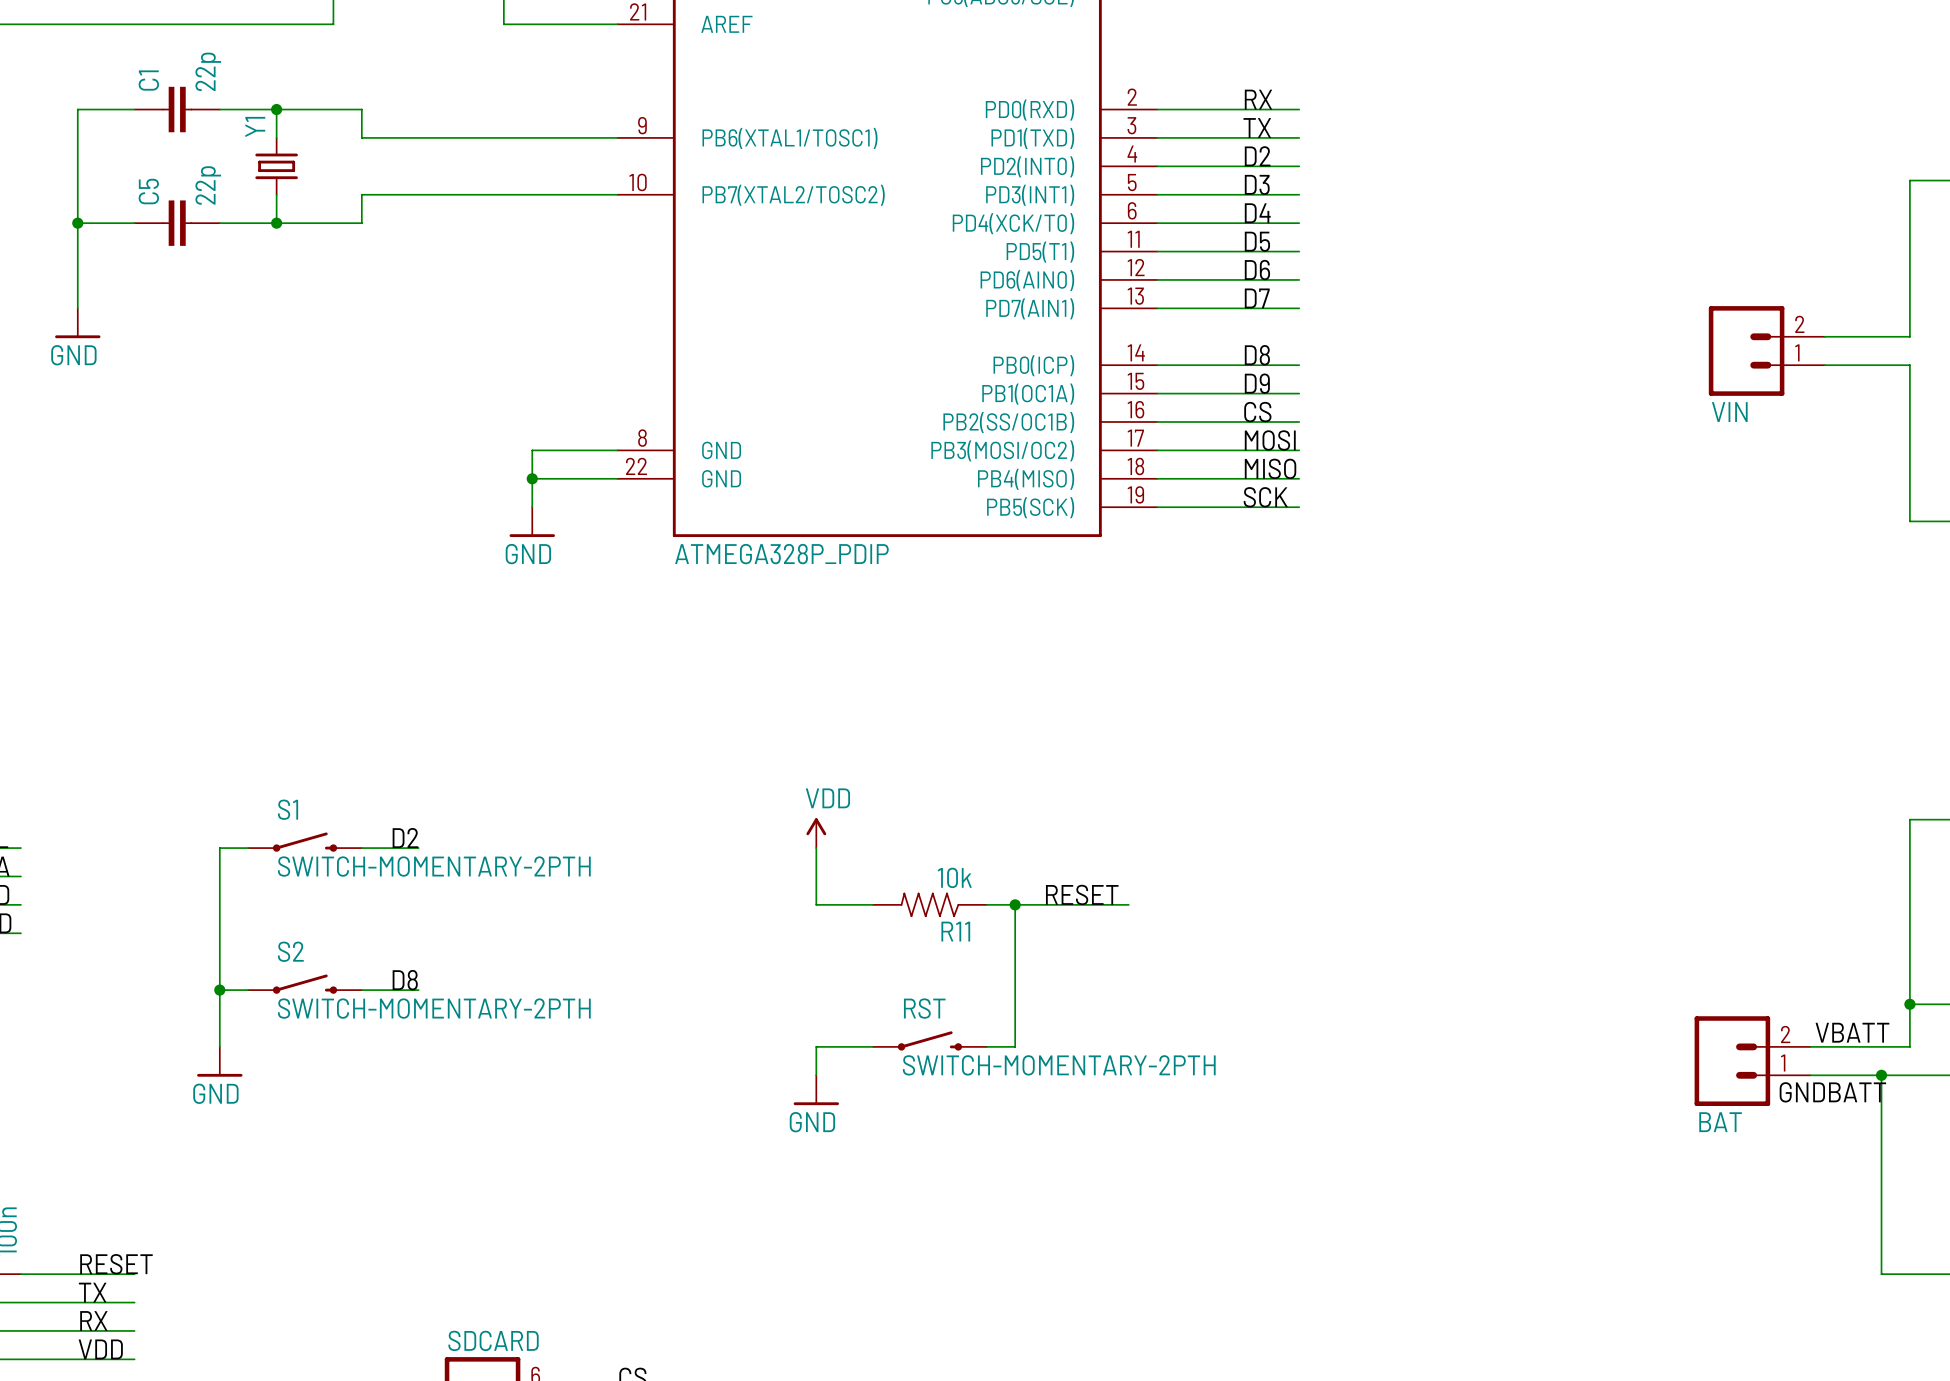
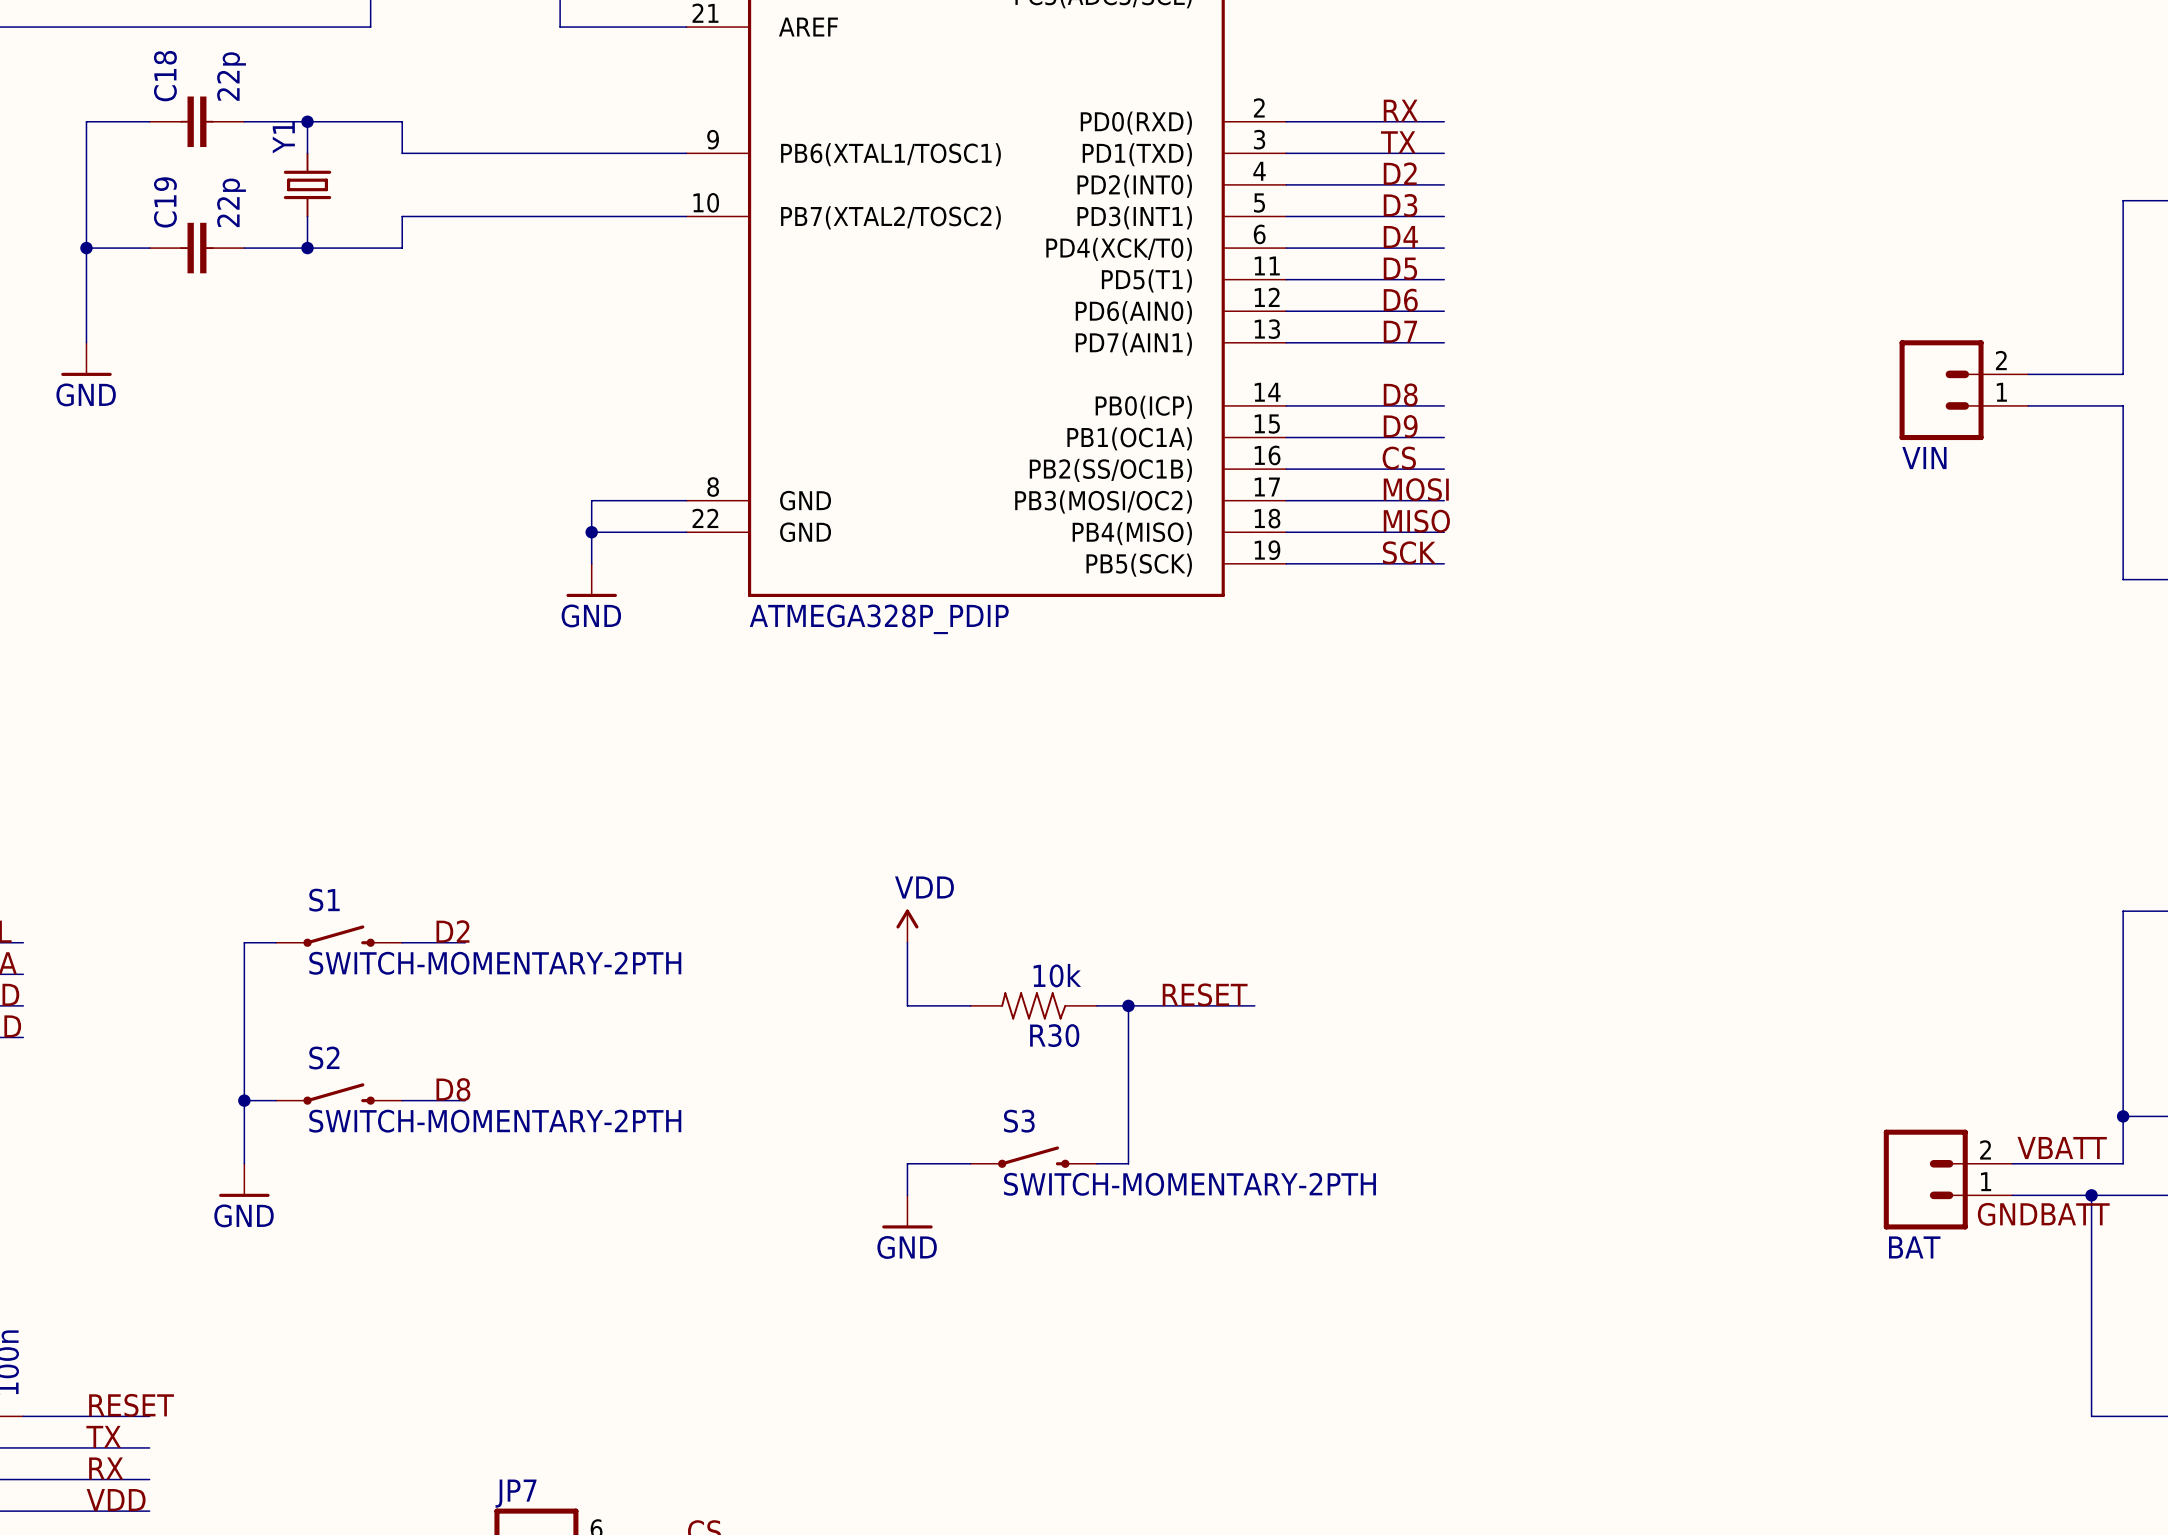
C1 name: C1 (148, 80) -> C18 (165, 76)
C5 name: C5 (148, 191) -> C19 (165, 202)
R11 name: R11 (955, 931) -> R30 (1054, 1035)
RST name: RST (924, 1008) -> S3 (1019, 1121)
SDCARD name: SDCARD (493, 1340) -> JP7 (516, 1493)

